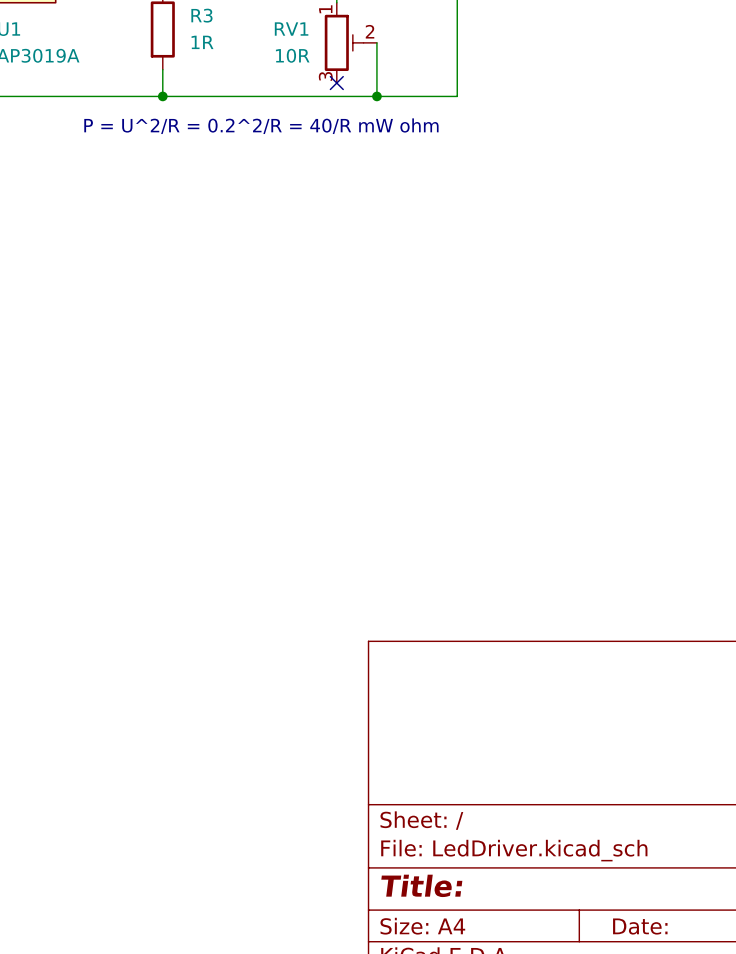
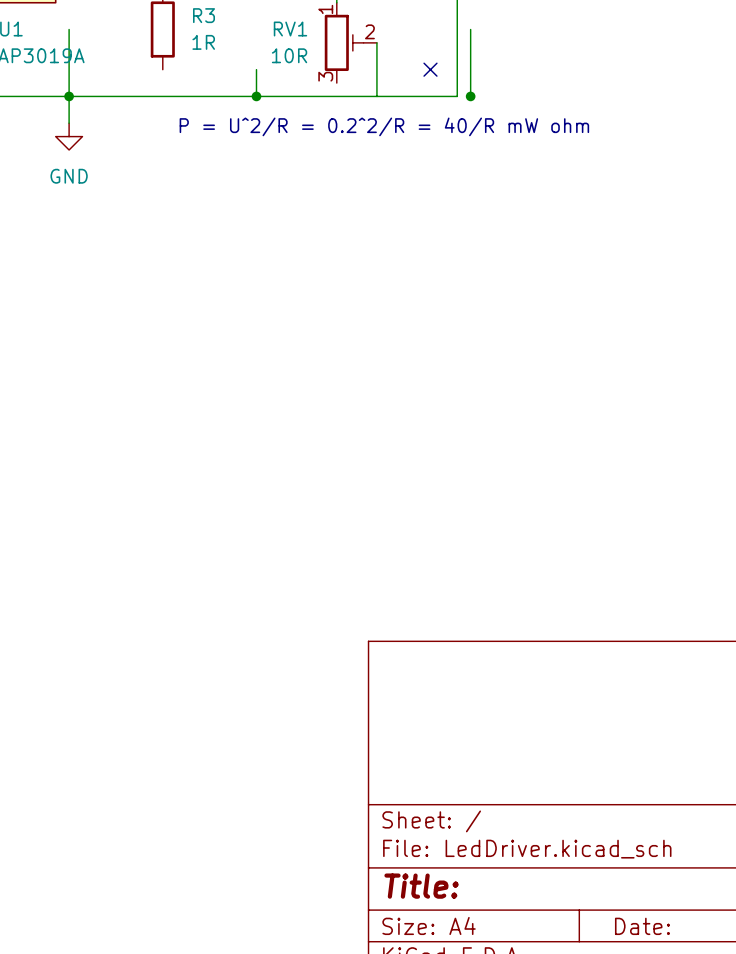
wire: none -> (69, 29) (69, 123)
wire: none -> (470, 29) (470, 96)
wire: (162, 69) (162, 96) -> (256, 69) (256, 96)
no-connect mark: none -> (430, 69)
no-connect mark: (336, 83) -> none
junction: none -> (69, 96)
junction: (162, 96) -> none
junction: none -> (256, 96)
junction: (376, 96) -> none
junction: none -> (470, 96)
text position: P = U^2/R = 0.2^2/R = 40/R mW ohm (261, 126) -> P = U^2/R = 0.2^2/R = 40/R mW ohm (384, 126)
power symbol: none -> GND (69, 136)

